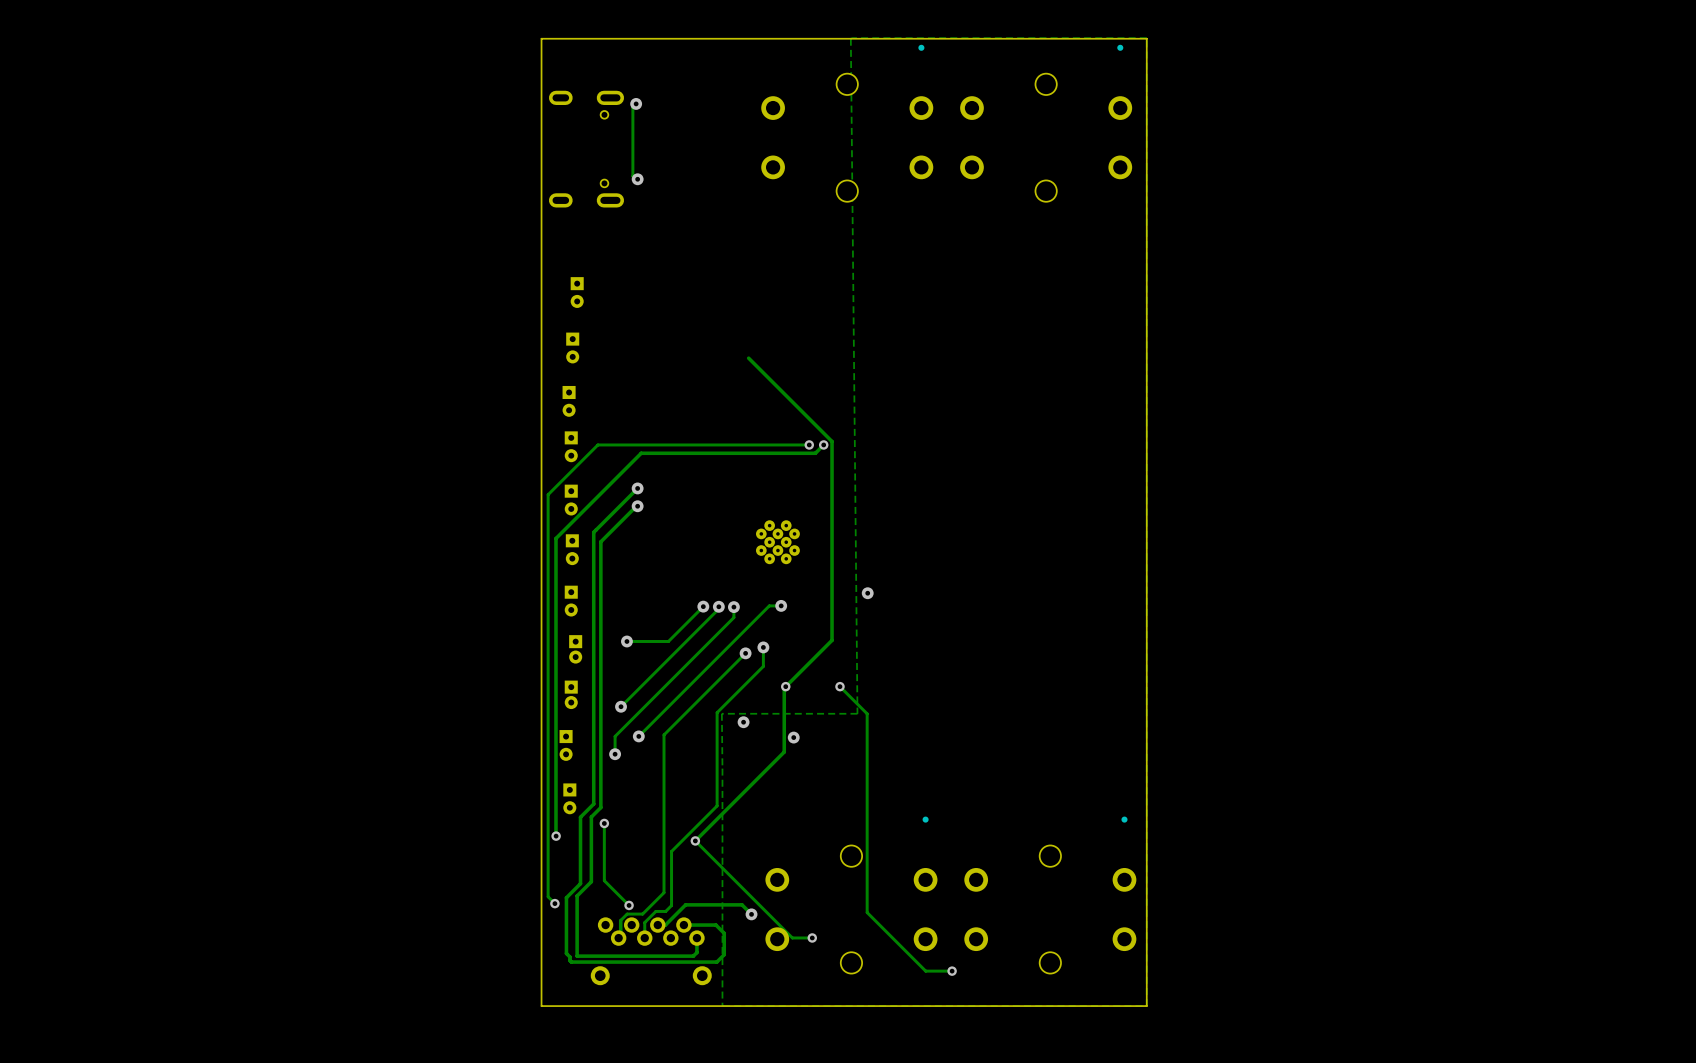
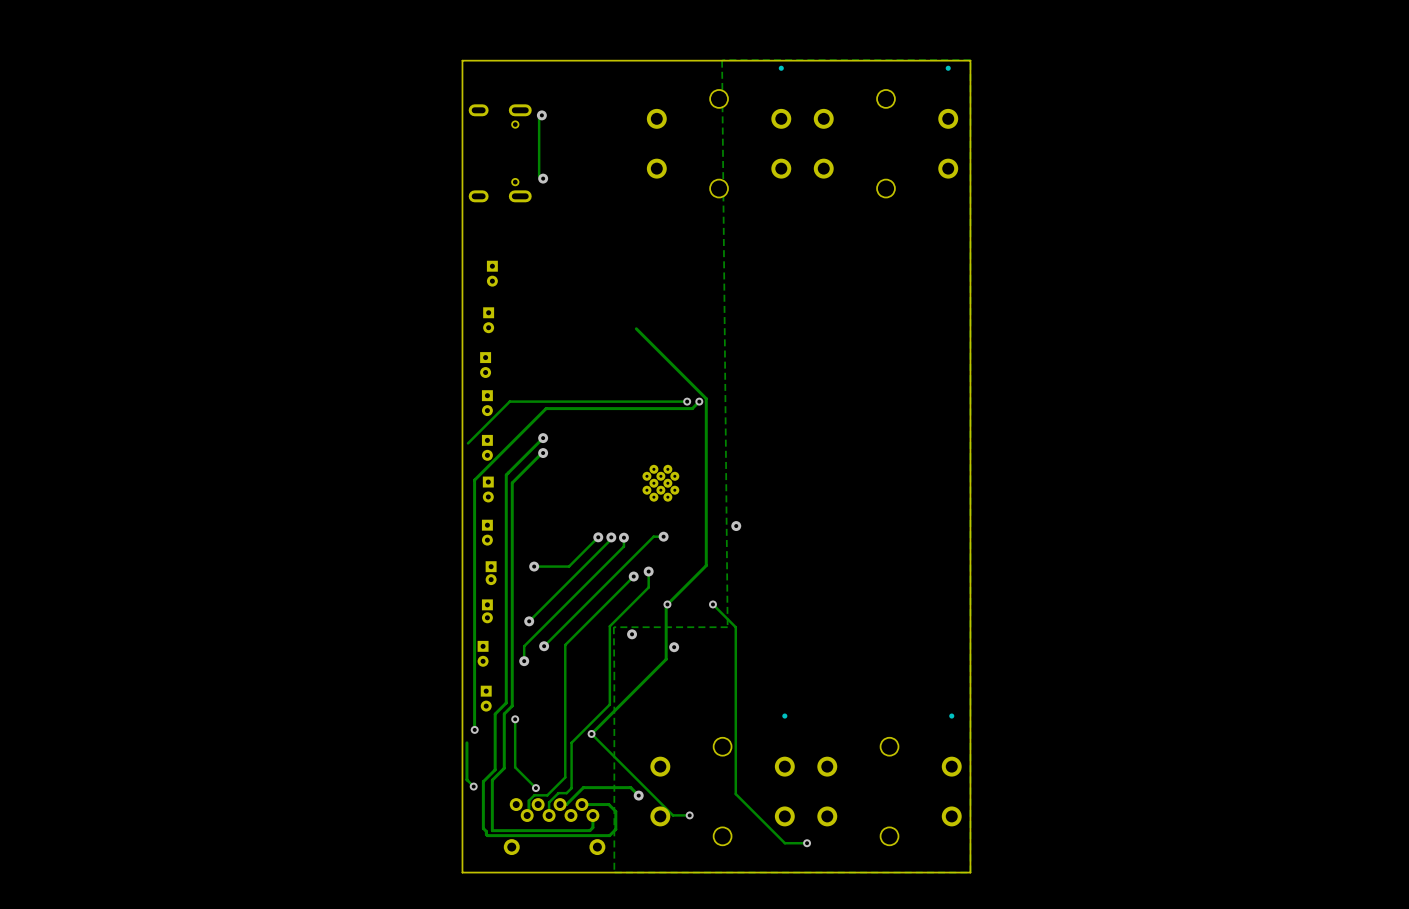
track: (548, 494) (548, 896) -> (466, 742) (467, 780)

